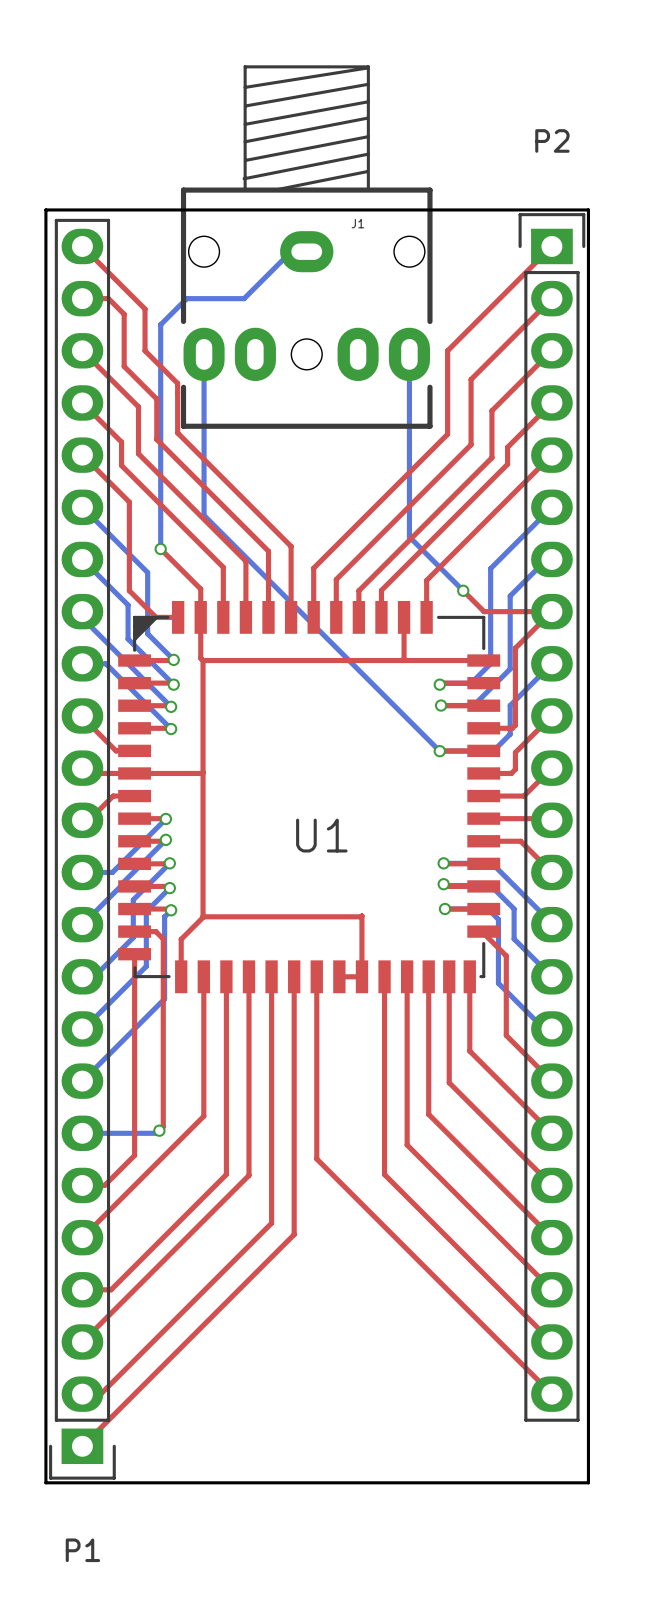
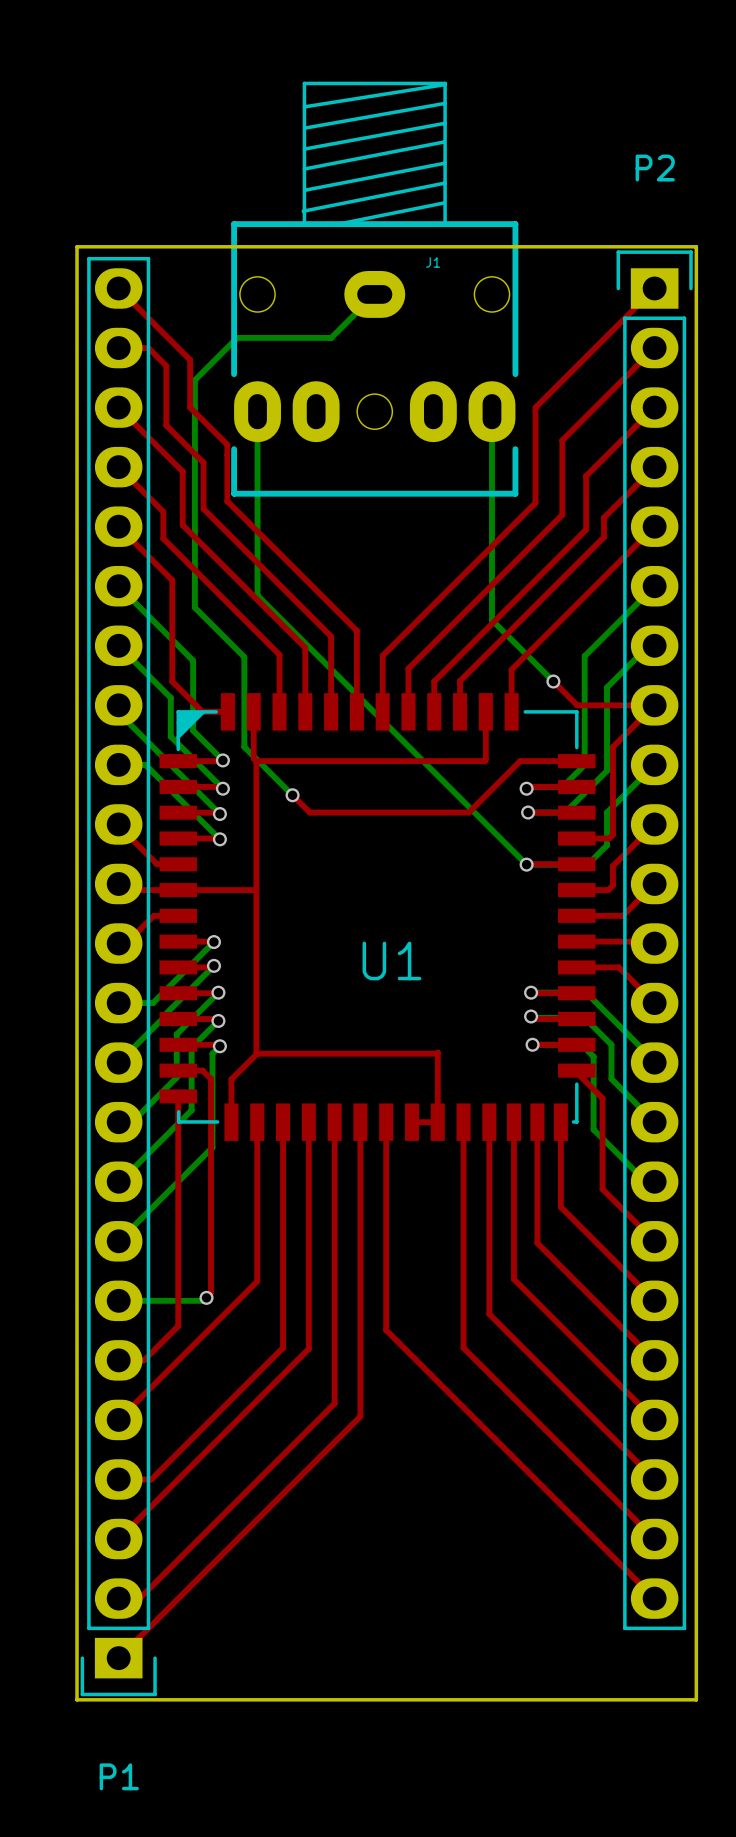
bottom track: (306, 251) (291, 251) (244, 298) (186, 298) (160, 324) (160, 549) -> (374, 294) (331, 337) (237, 337) (194, 380) (194, 607) (244, 657) (244, 747) (292, 795)
top track: (160, 549) (200, 589) (200, 617) -> none
via: (160, 549) -> none
top track: (403, 660) (434, 660) -> (292, 795) (309, 812) (468, 812) (520, 761)
via: none -> (292, 795)

